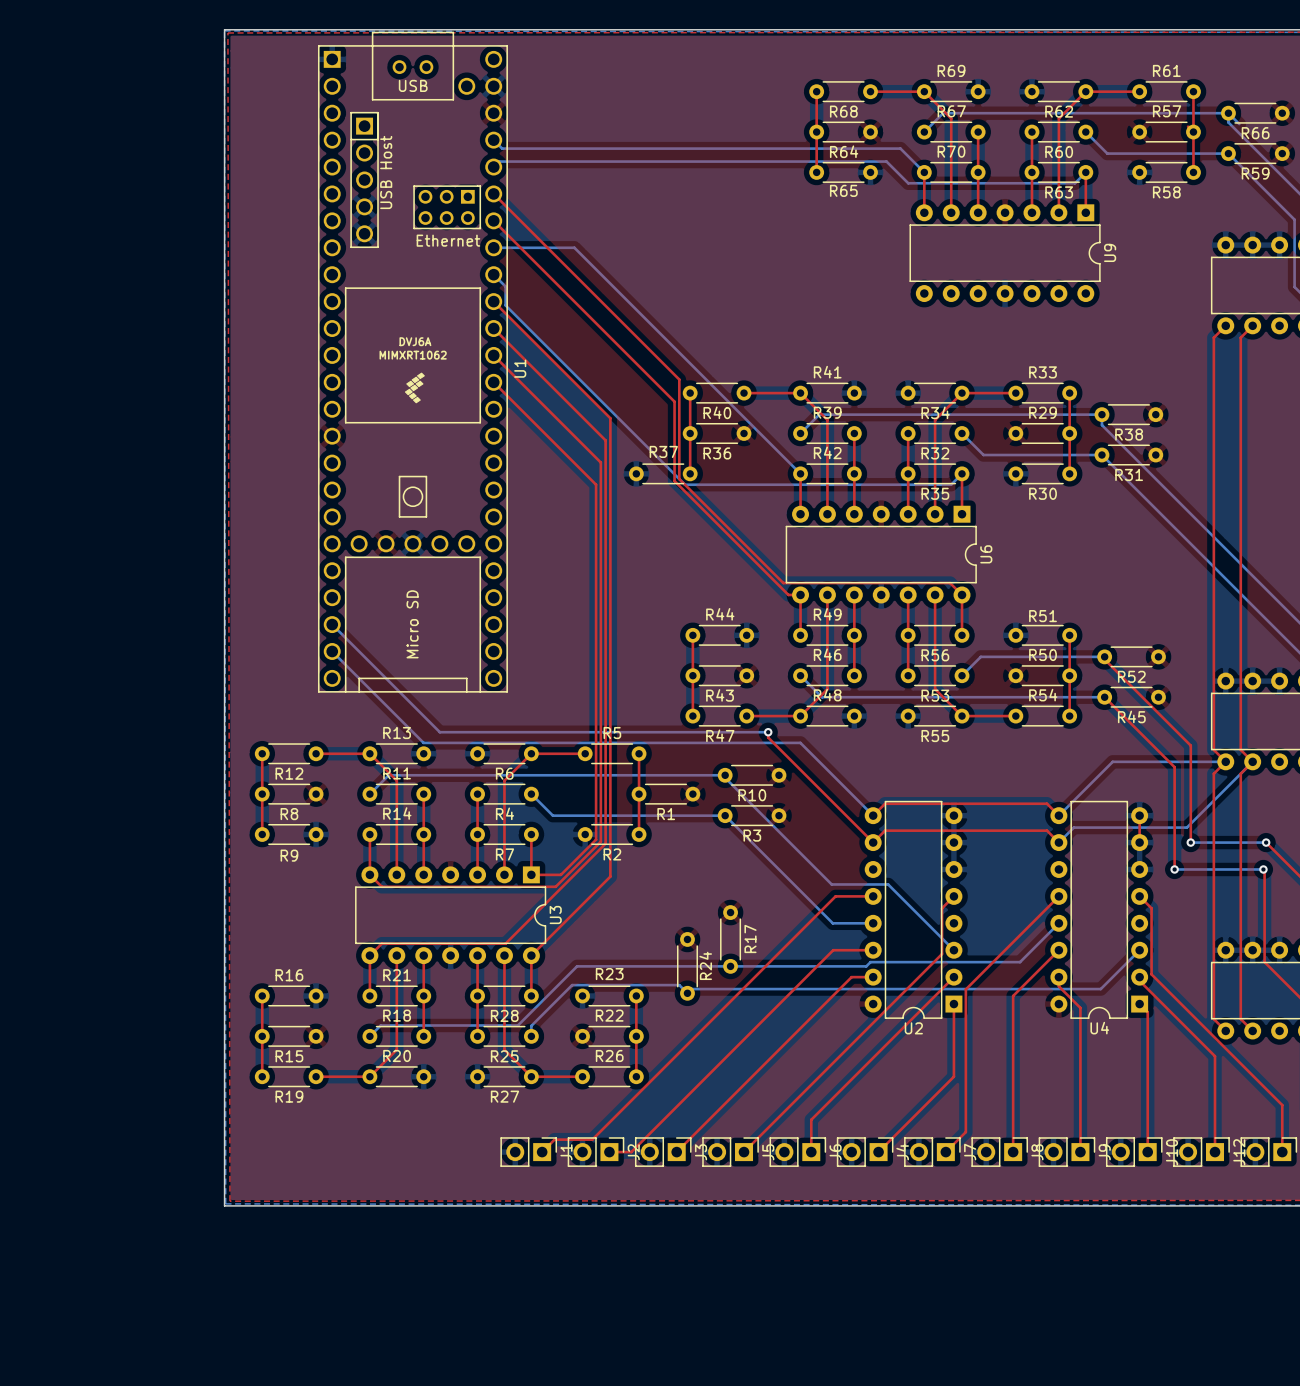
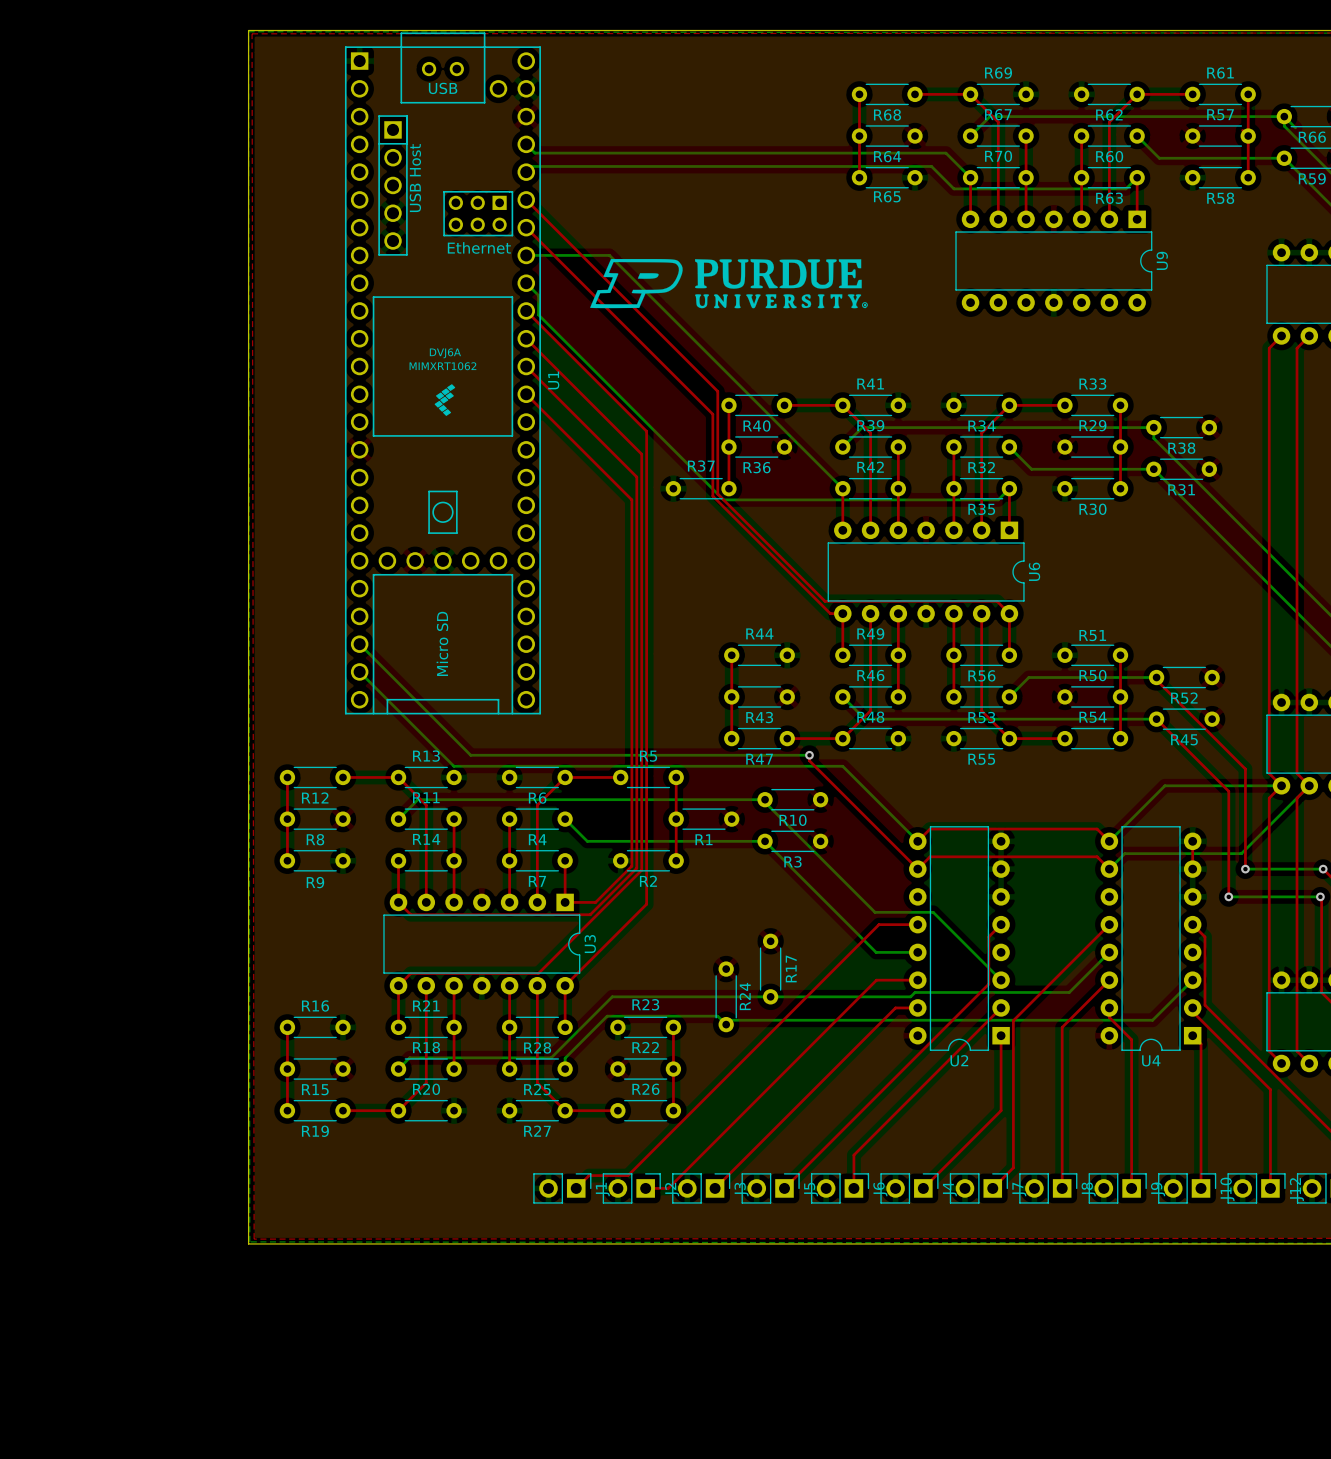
drawing: none -> [590, 258, 868, 309]

